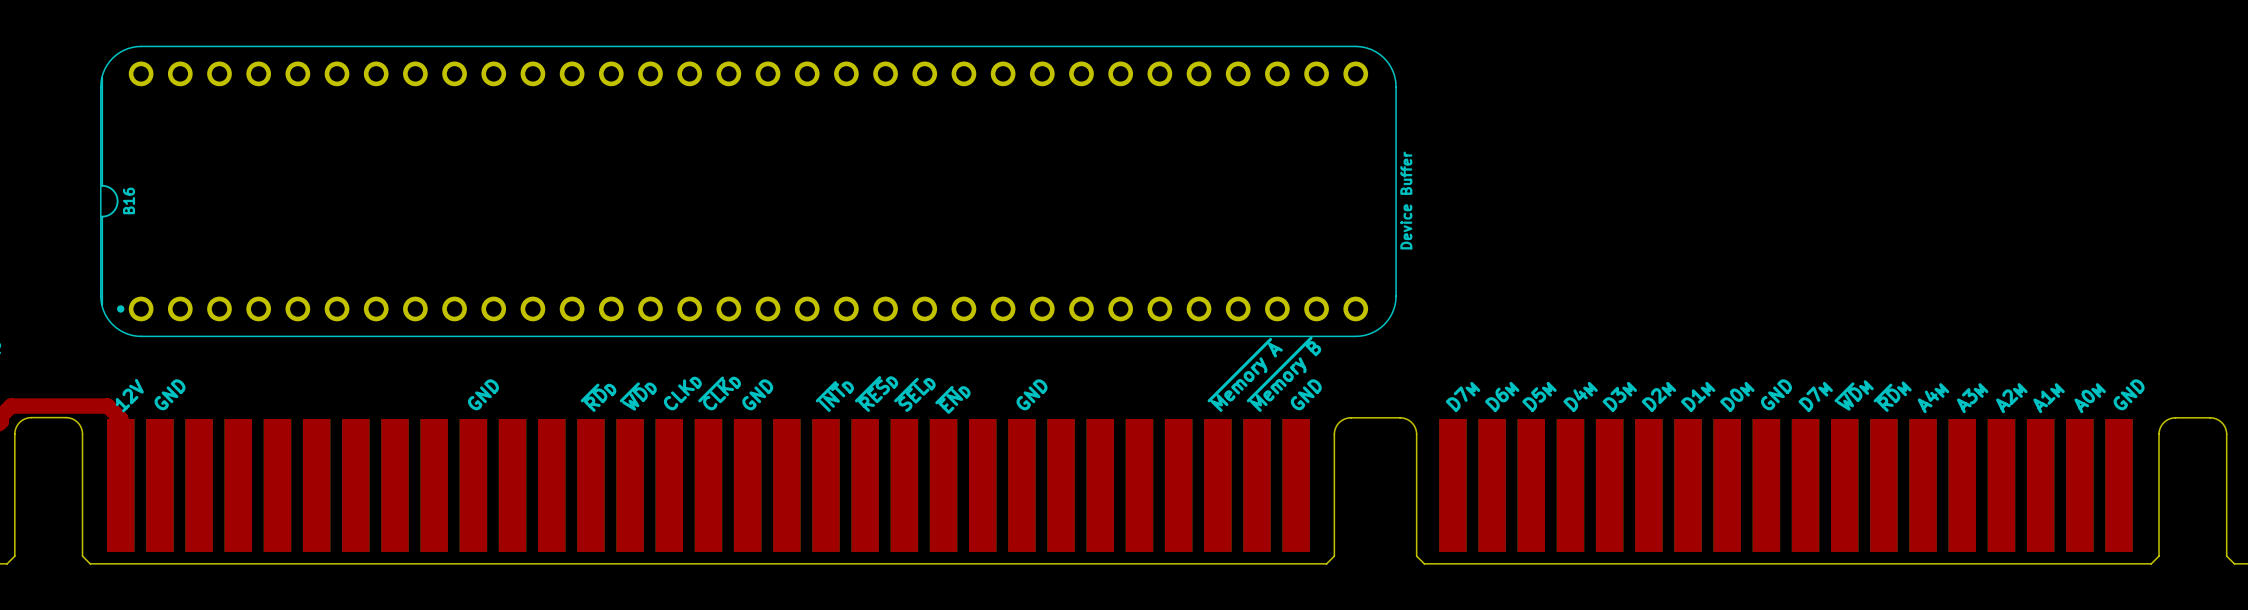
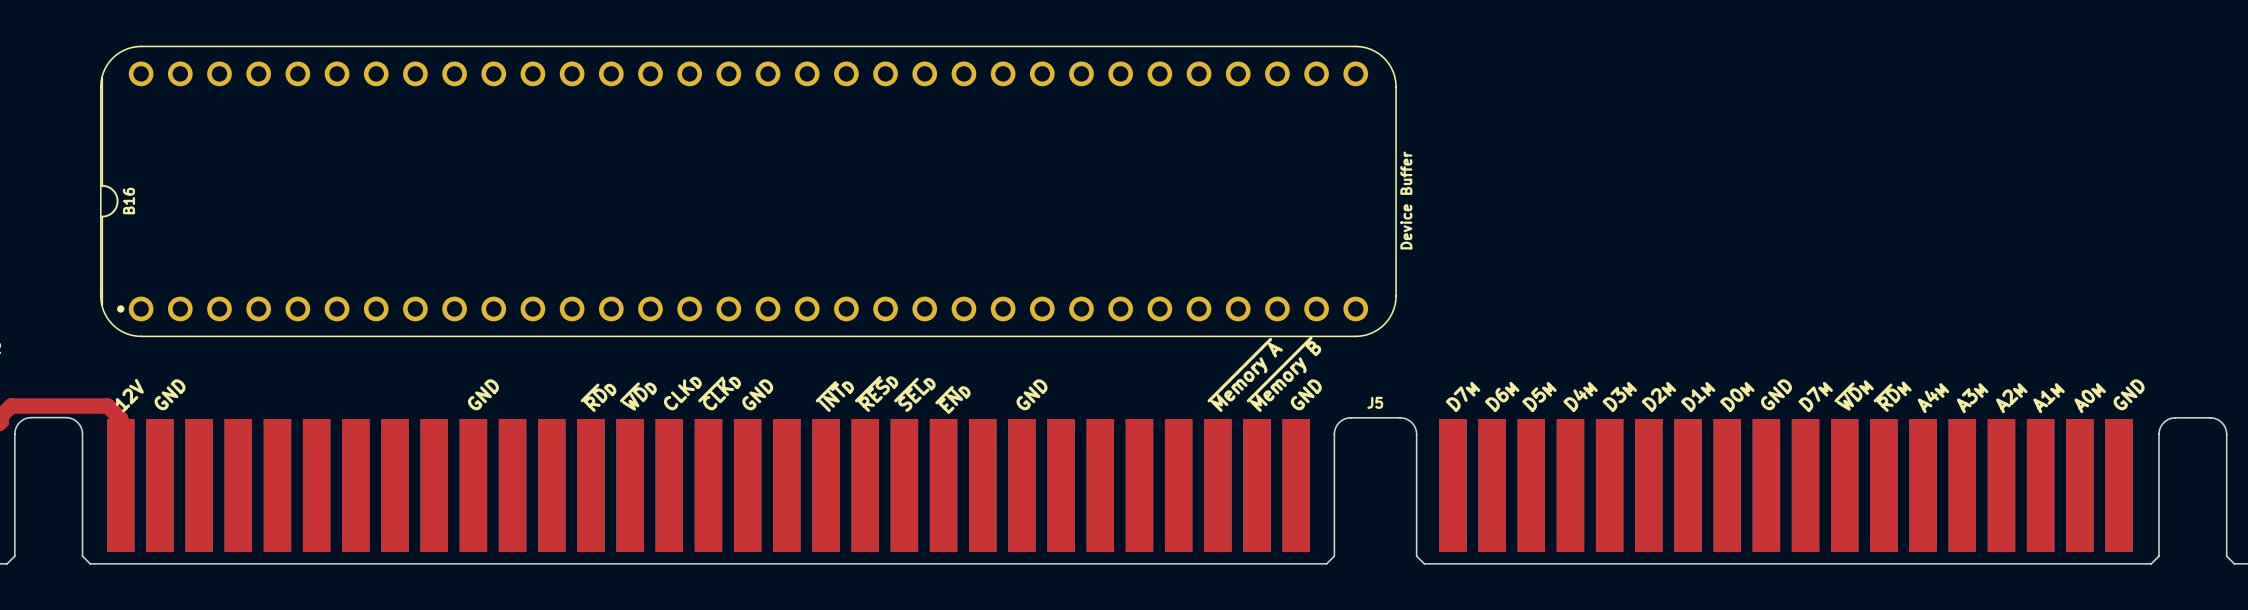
J5: none -> (1120, 490)

